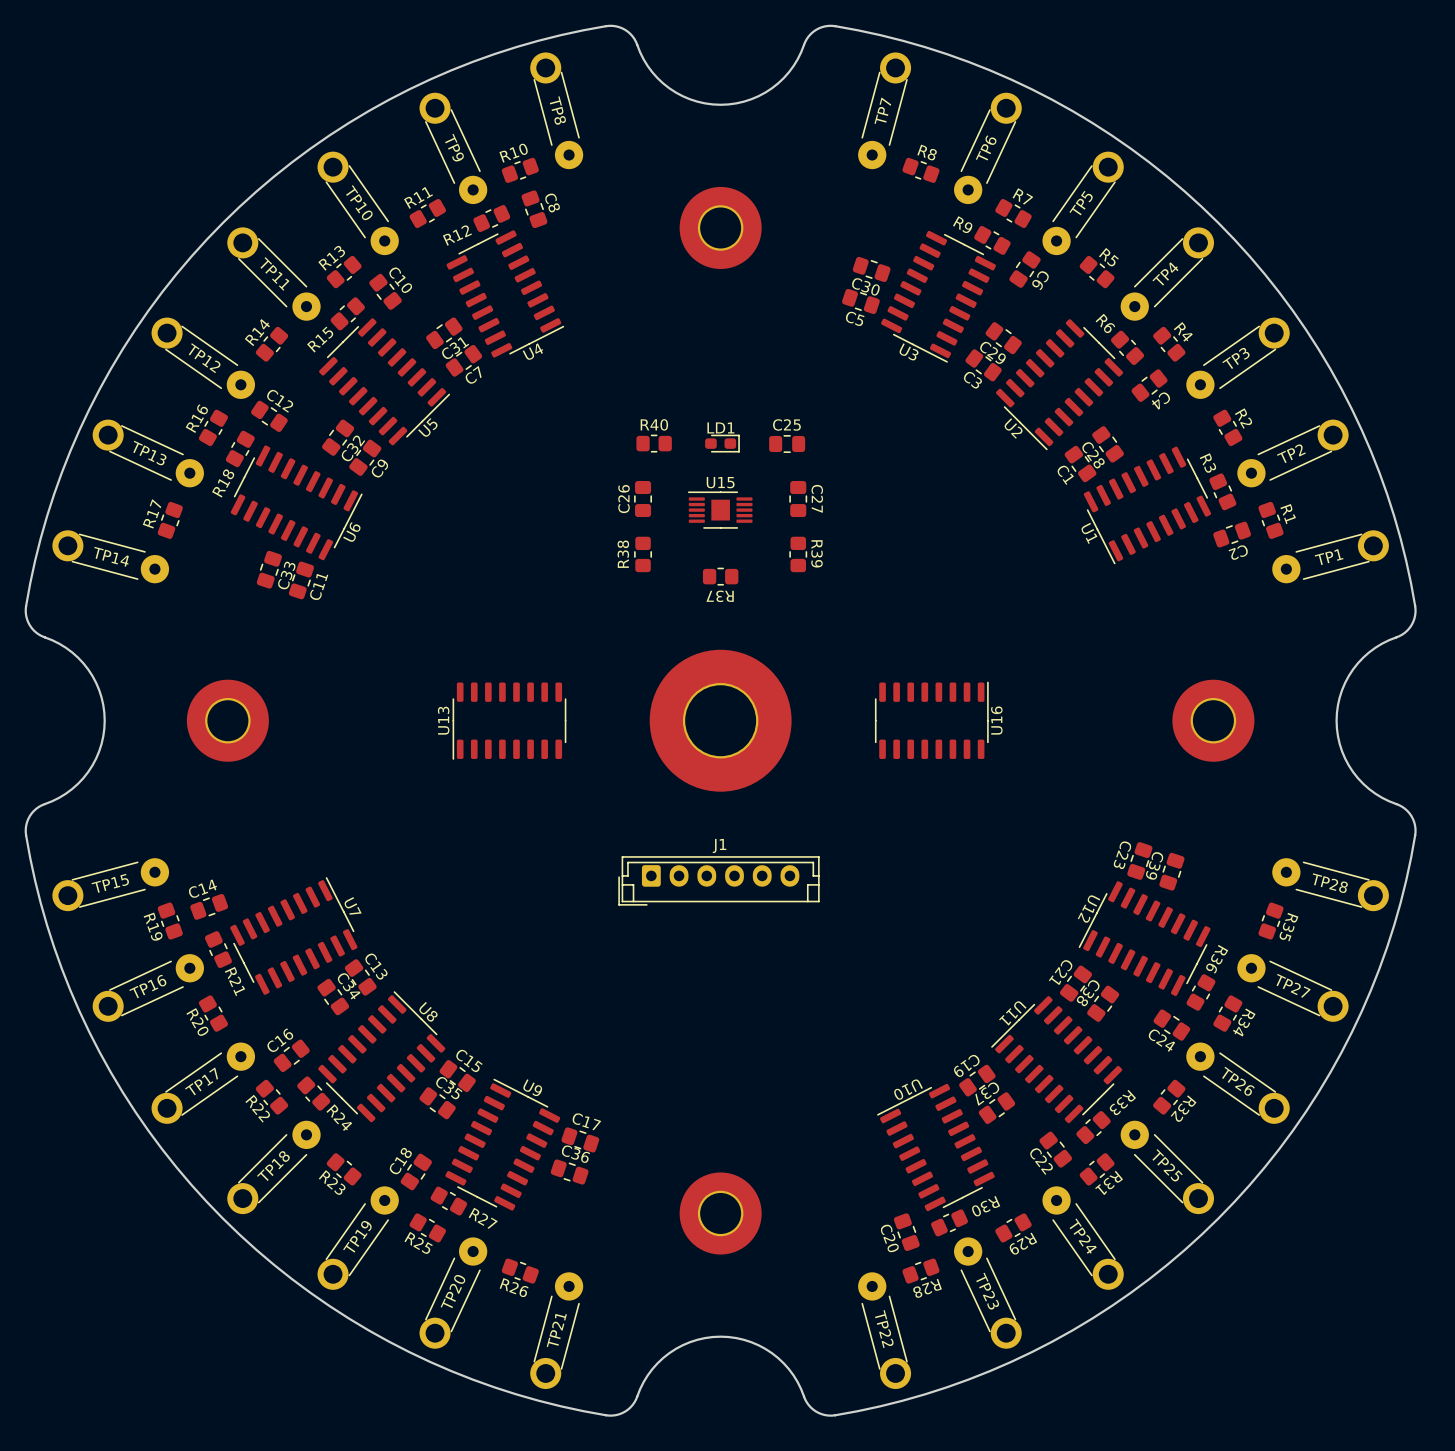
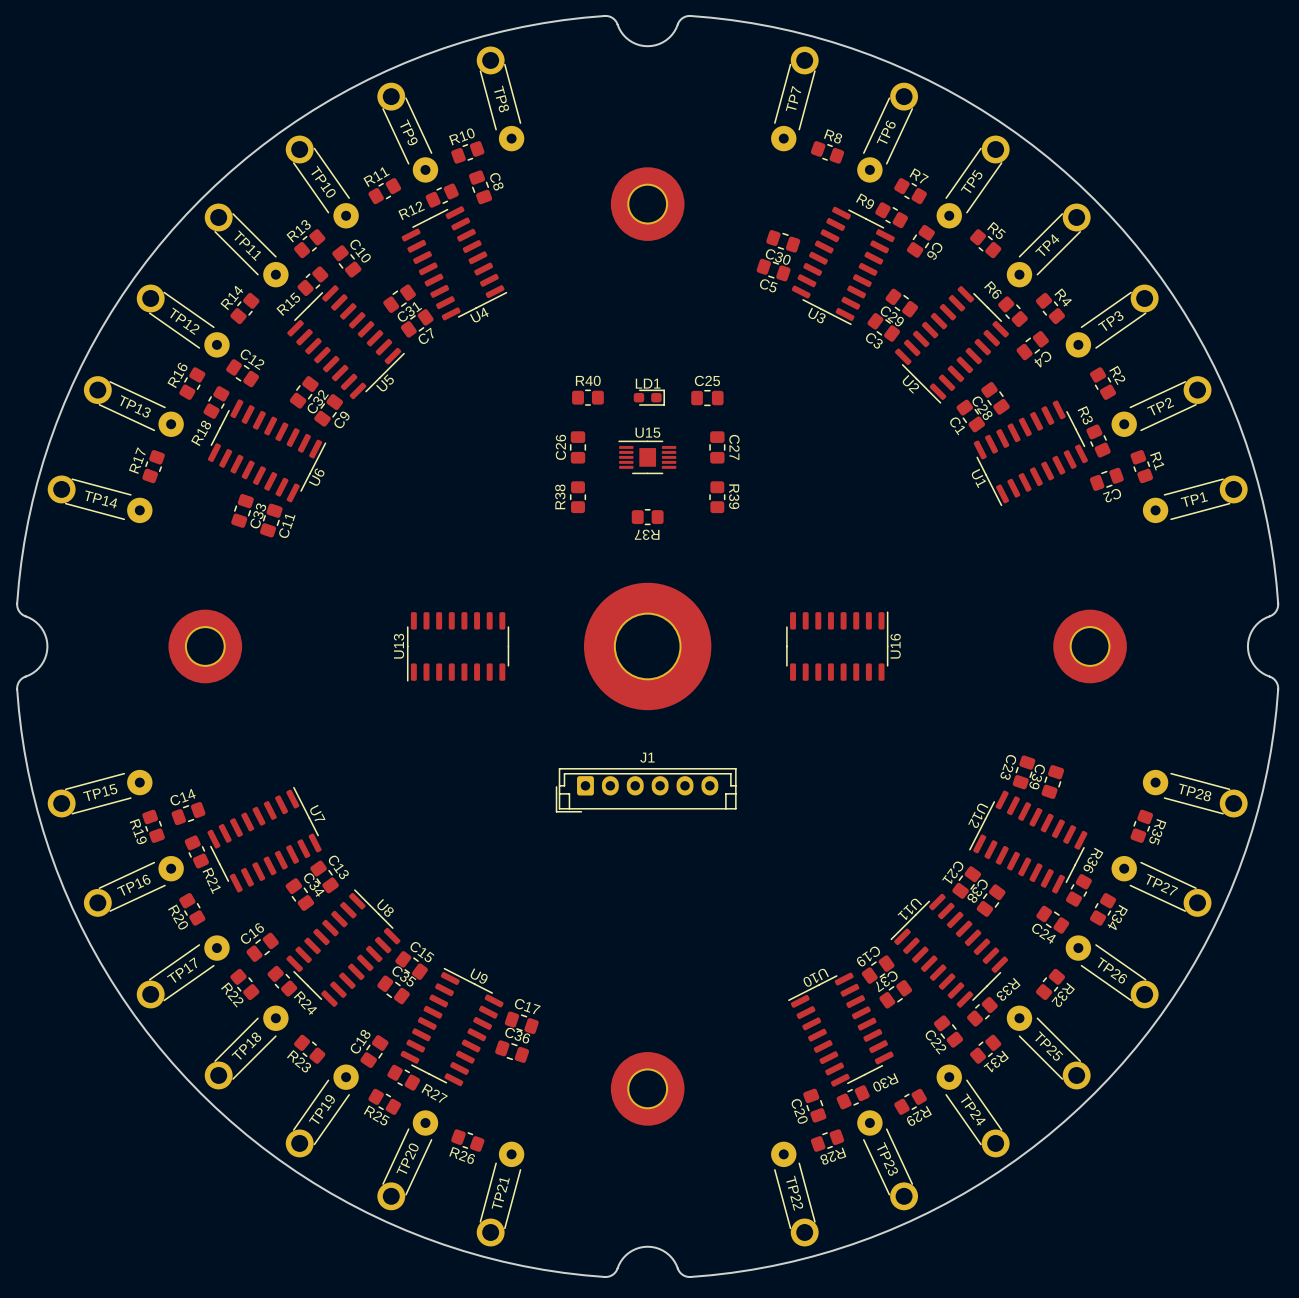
board edge: (606, 26) (619, 27) (630, 33) (647, 65) (669, 88) (697, 101) (720, 104) (743, 101) (771, 88) (788, 72) (797, 59) (806, 38) (819, 28) (835, 26) (880, 35) (946, 54) (1011, 79) (1072, 111) (1130, 148) (1184, 191) (1234, 239) (1279, 292) (1318, 349) (1352, 409) (1379, 472) (1400, 538) (1415, 606) (1414, 619) (1407, 630) (1375, 647) (1353, 669) (1339, 697) (1336, 720) (1342, 751) (1353, 772) (1369, 789) (1382, 797) (1402, 806) (1413, 819) (1415, 835) (1406, 880) (1387, 946) (1361, 1011) (1330, 1072) (1292, 1130) (1249, 1184) (1201, 1234) (1149, 1279) (1092, 1318) (1031, 1352) (968, 1379) (902, 1400) (835, 1415) (822, 1414) (810, 1407) (793, 1375) (771, 1353) (751, 1342) (720, 1336) (690, 1342) (669, 1353) (652, 1369) (643, 1382) (634, 1402) (622, 1413) (606, 1415) (560, 1406) (494, 1387) (430, 1361) (368, 1330) (310, 1292) (256, 1249) (206, 1201) (162, 1149) (122, 1092) (89, 1032) (61, 968) (40, 902) (26, 835) (27, 822) (33, 811) (65, 793) (88, 772) (101, 743) (104, 720) (101, 697) (88, 669) (72, 652) (59, 643) (38, 634) (28, 622) (26, 606) (35, 560) (54, 494) (79, 430) (111, 368) (148, 310) (191, 256) (239, 206) (292, 162) (348, 122) (409, 89) (472, 61) (538, 40) (606, 26) -> (604, 15) (543, 23) (482, 36) (424, 55) (367, 80) (313, 110) (262, 145) (215, 185) (172, 229) (134, 278) (100, 329) (72, 384) (49, 442) (28, 521) (17, 604) (21, 613) (32, 619) (41, 627) (46, 638) (47, 650) (41, 665) (32, 673) (21, 679) (17, 689) (24, 750) (37, 811) (56, 869) (81, 926) (111, 980) (146, 1031) (186, 1078) (230, 1121) (279, 1159) (331, 1193) (386, 1221) (443, 1244) (523, 1266) (606, 1277) (614, 1273) (621, 1261) (629, 1252) (639, 1247) (651, 1246) (666, 1252) (674, 1261) (680, 1273) (690, 1276) (751, 1269) (812, 1256) (871, 1237) (927, 1212) (981, 1182) (1032, 1147) (1079, 1107) (1122, 1063) (1161, 1014) (1194, 962) (1222, 908) (1245, 850) (1267, 771) (1278, 688) (1274, 679) (1262, 673) (1253, 665) (1248, 654) (1248, 642) (1253, 627) (1262, 619) (1274, 613) (1278, 603) (1270, 542) (1257, 481) (1238, 422) (1214, 366) (1184, 312) (1148, 261) (1108, 214) (1064, 171) (1016, 132) (964, 99) (909, 71) (851, 48) (772, 26) (689, 15) (680, 19) (674, 31) (666, 40) (655, 45) (643, 45) (629, 40) (621, 31) (614, 19) (604, 15)

